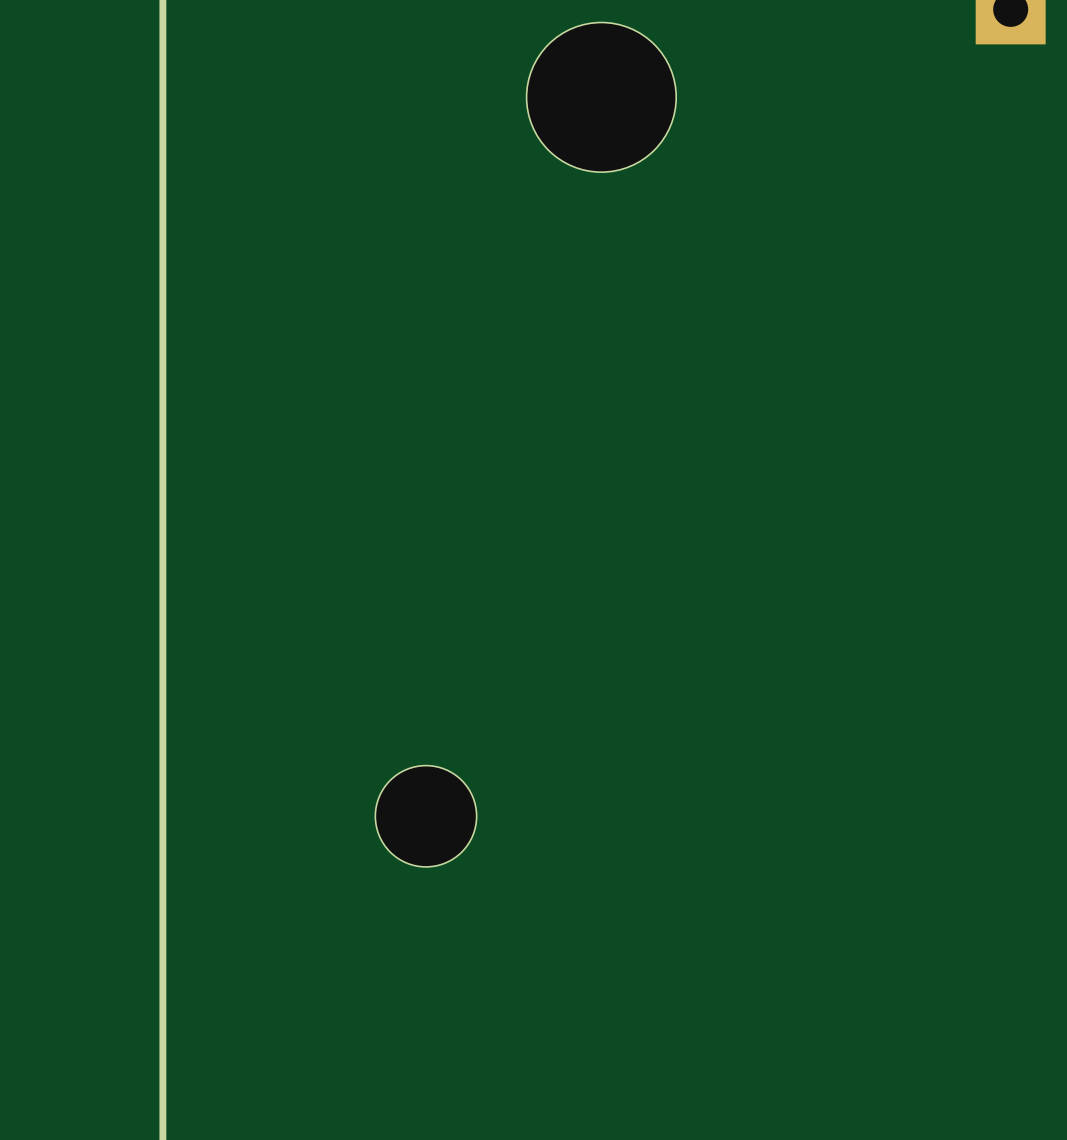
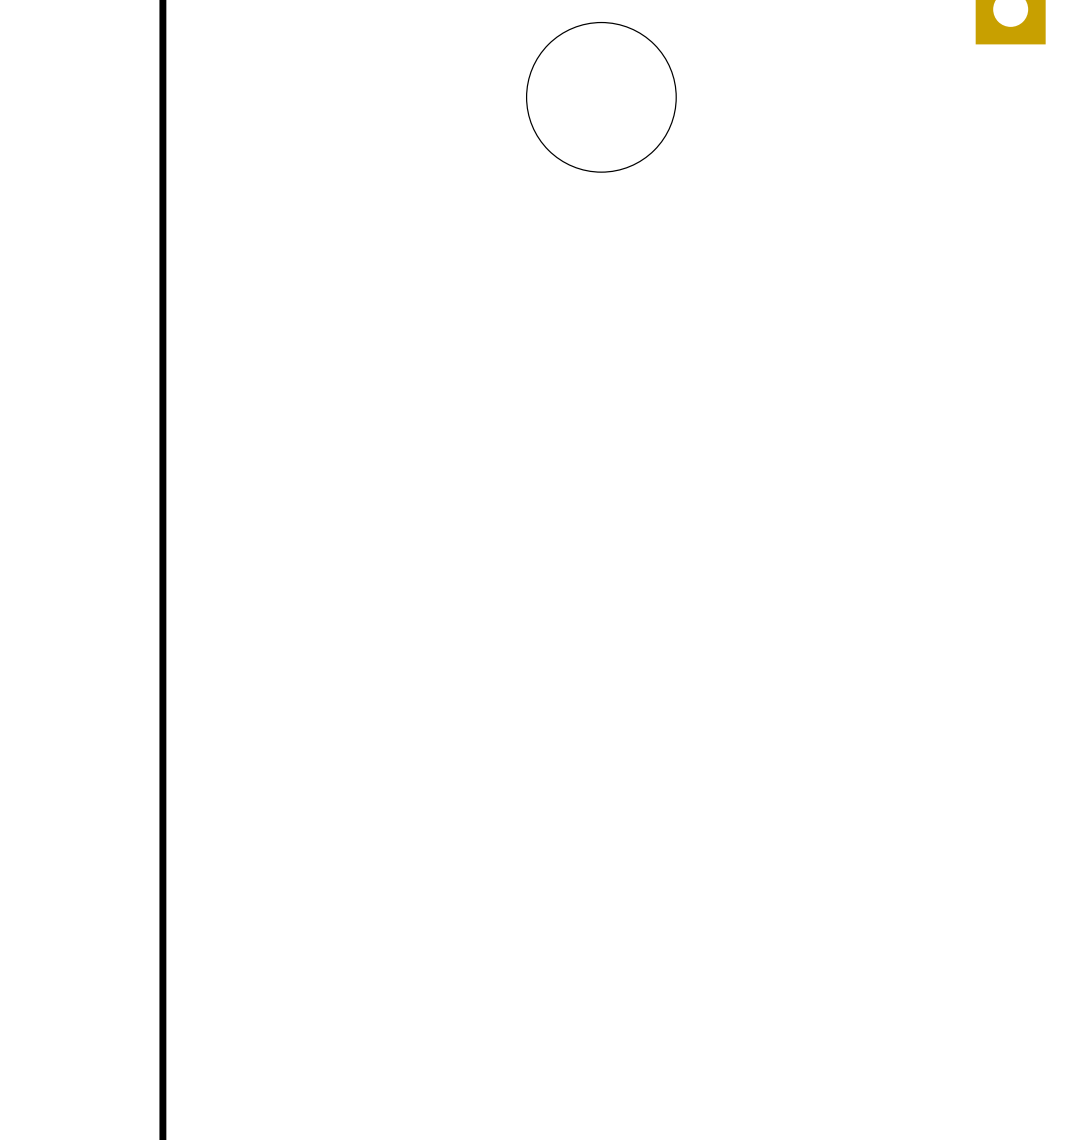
part: (426, 816) -> none

